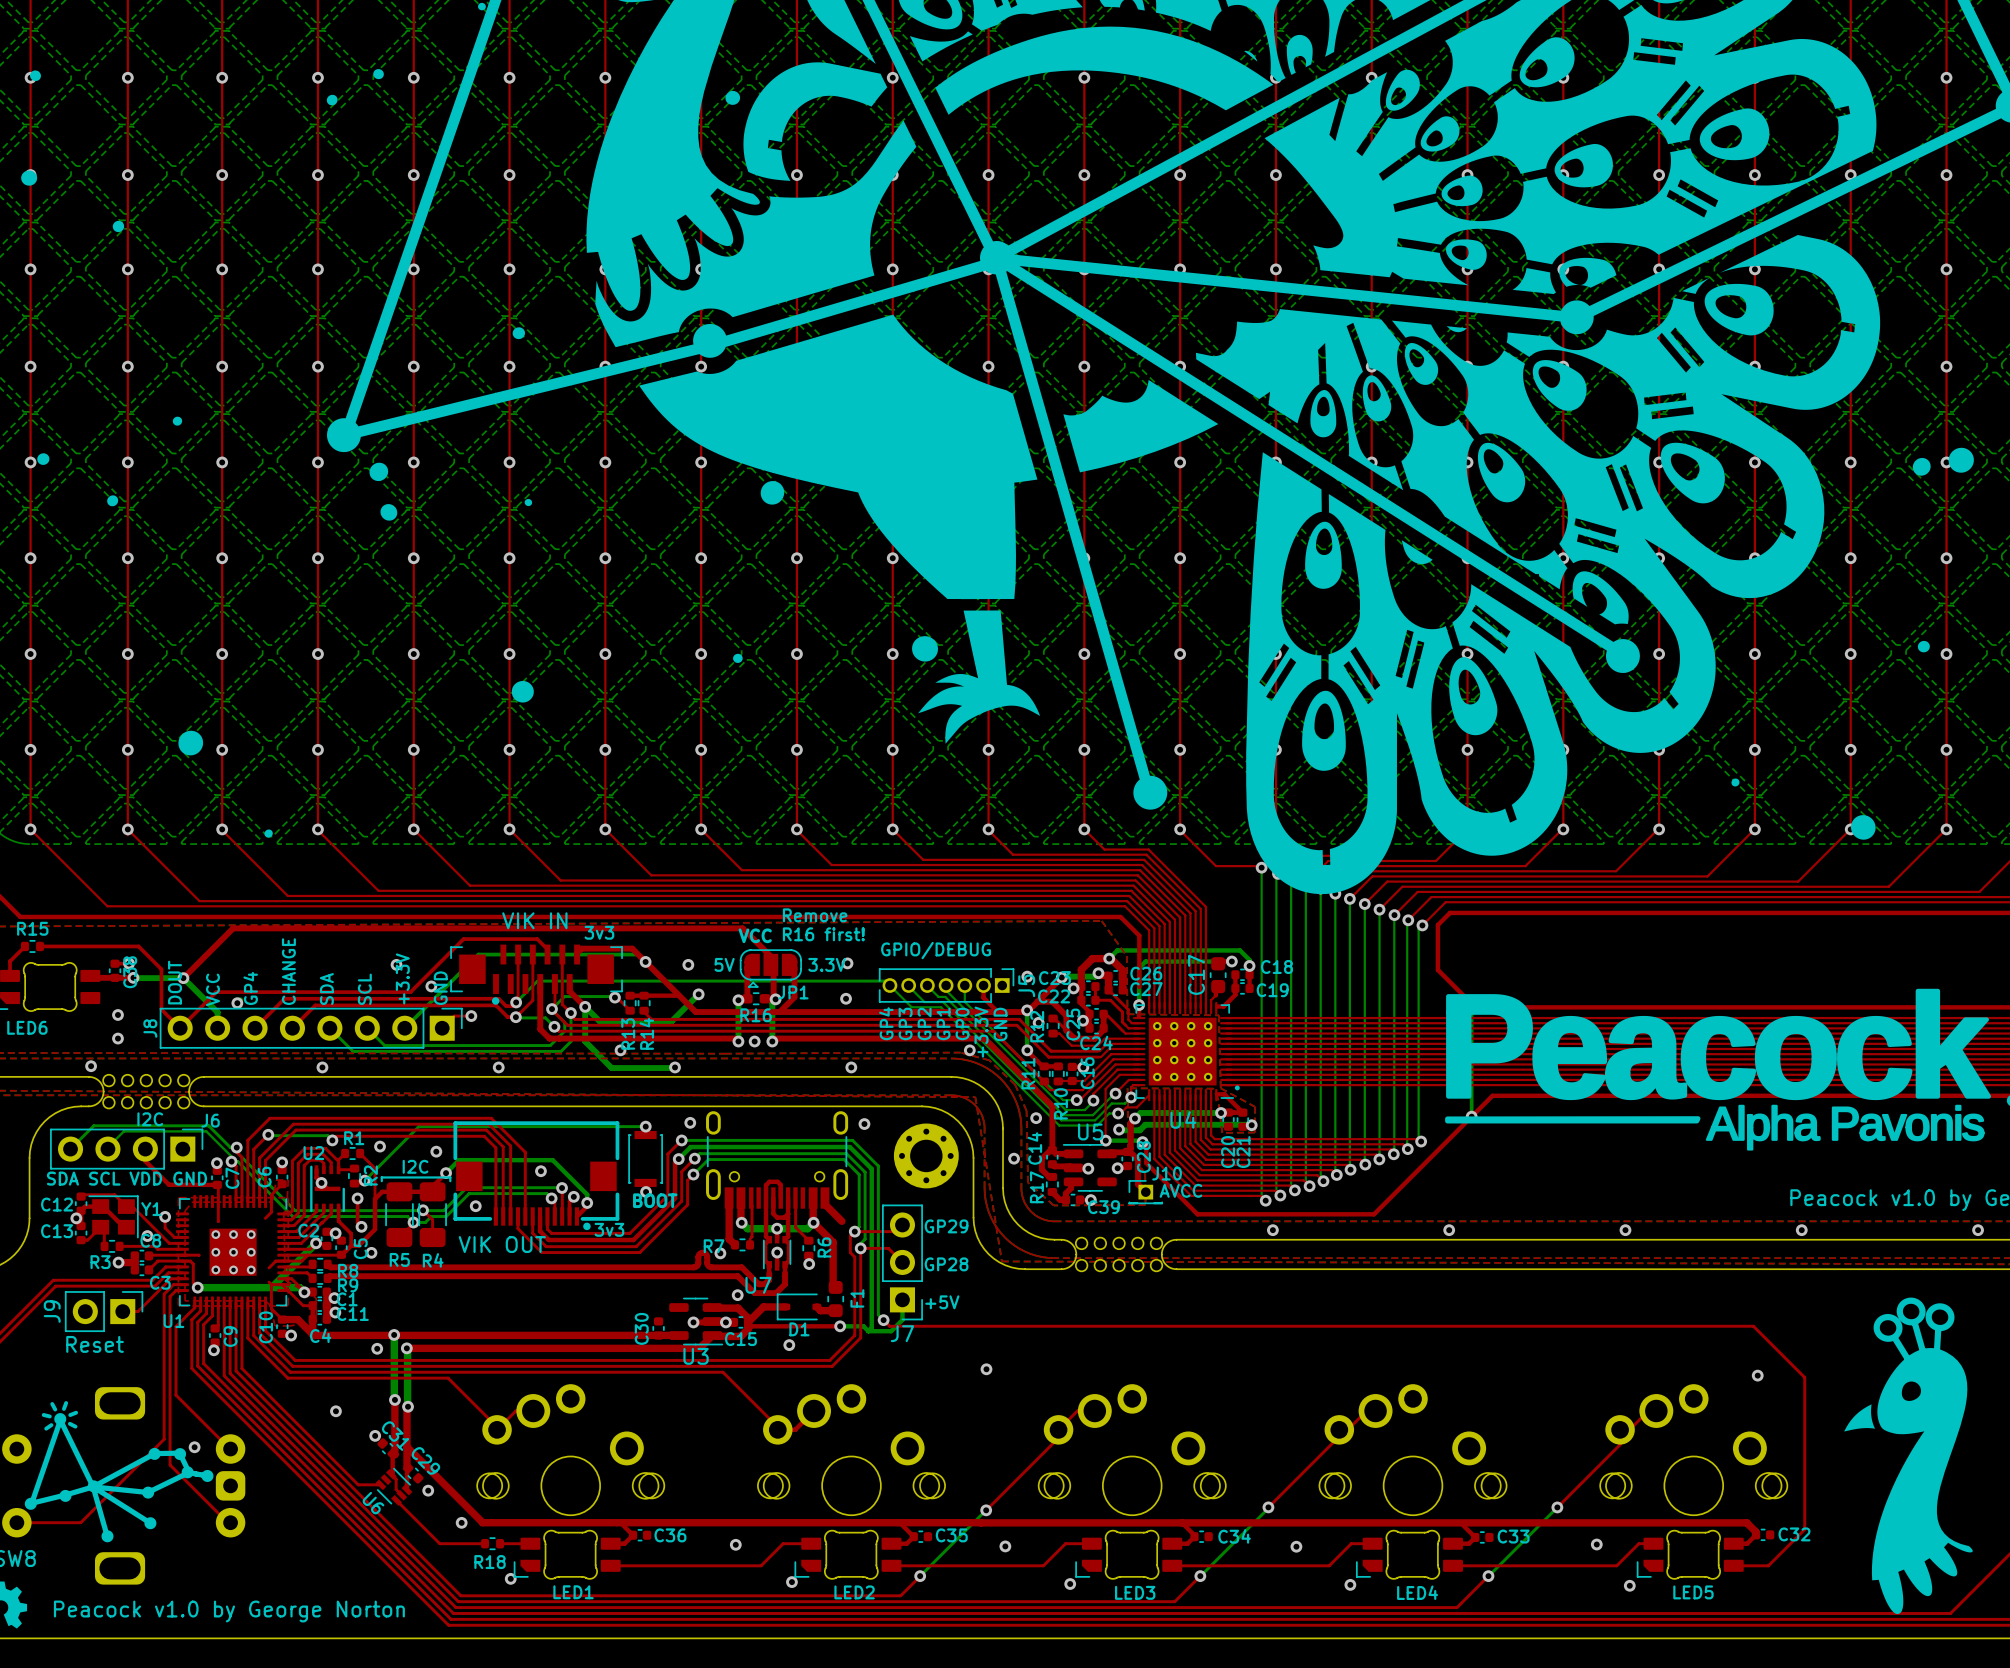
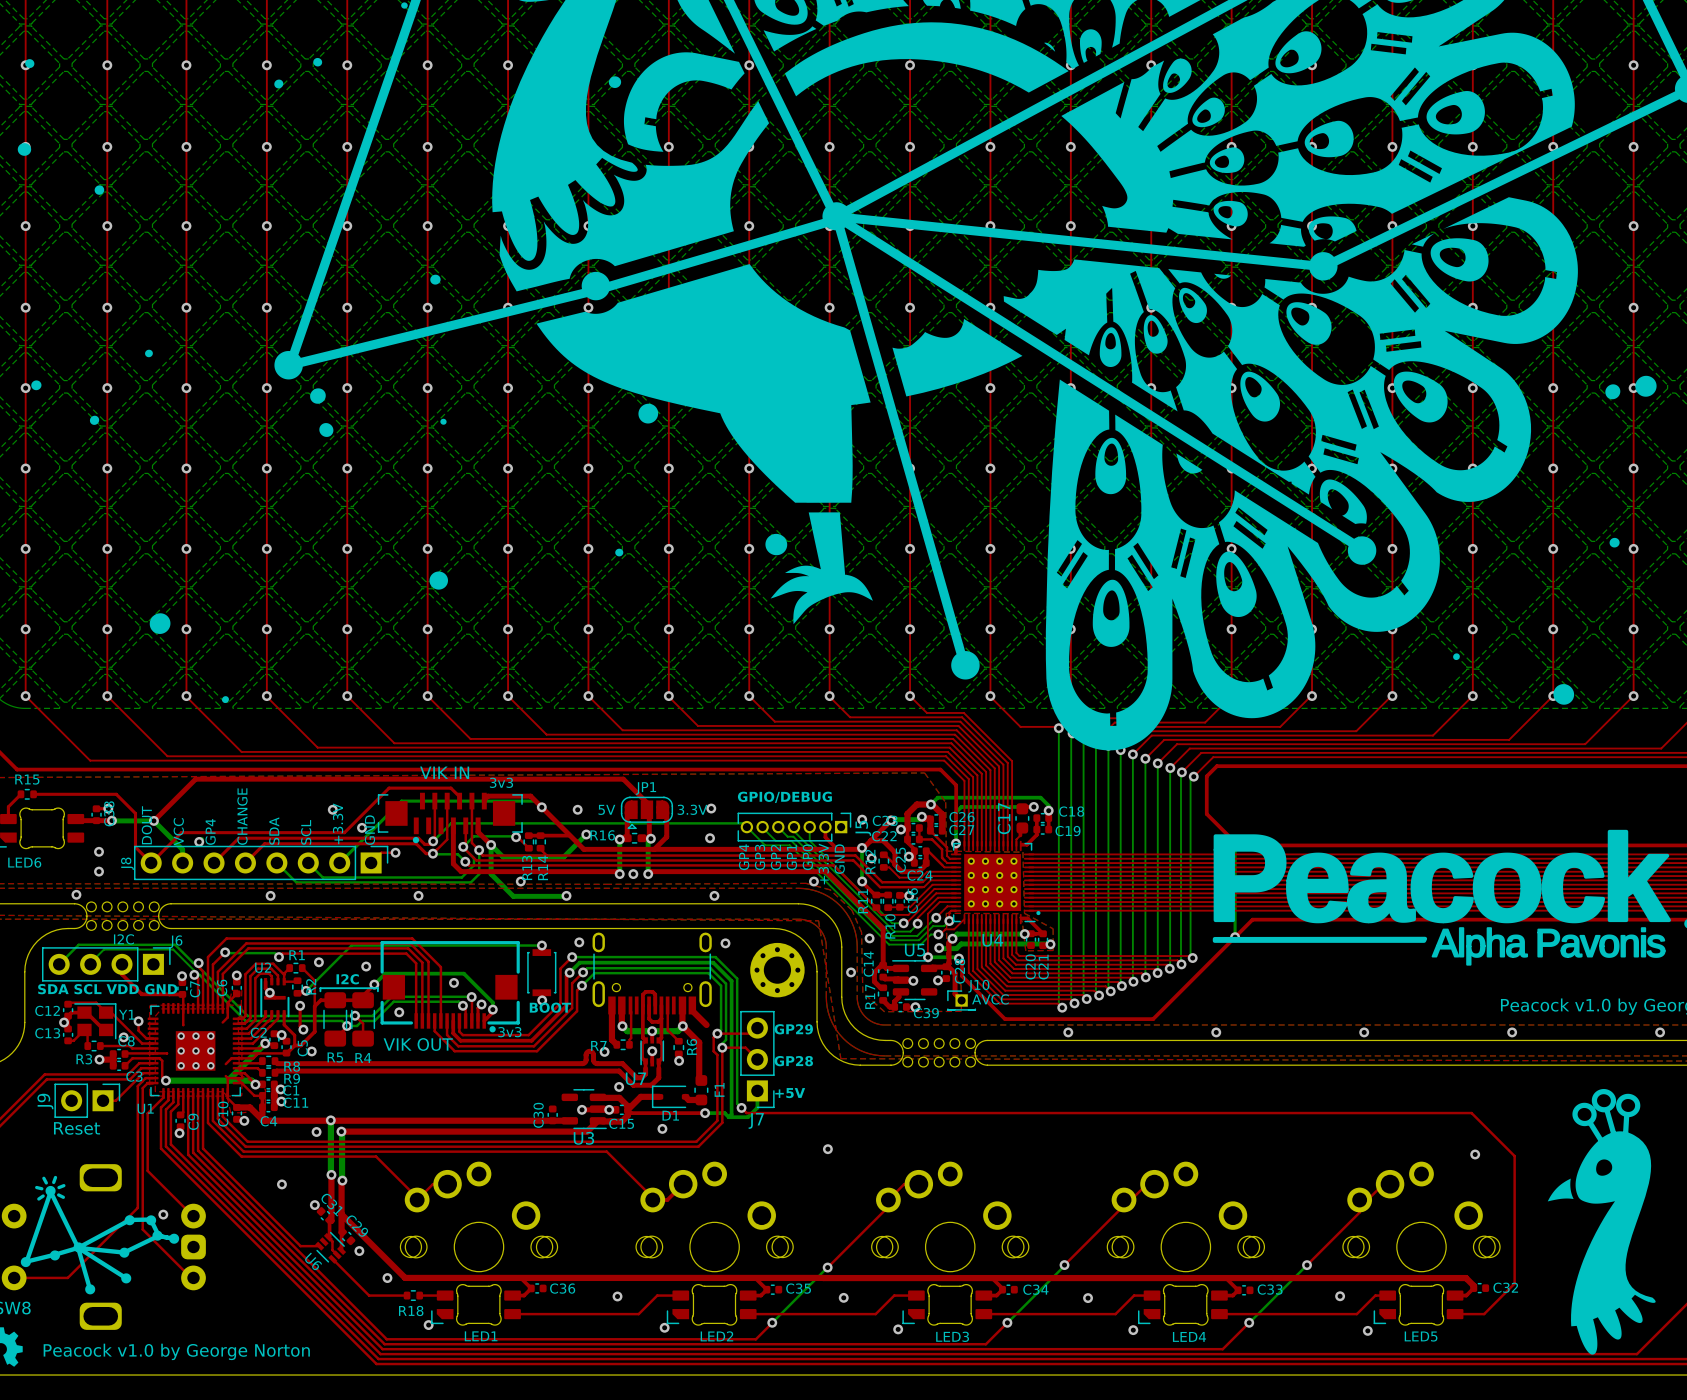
text: Remove (815, 915) -> none
text: R16 first! (823, 934) -> none
text: VCC (755, 935) -> none
JP1 name position: JP1 (793, 992) -> JP1 (645, 788)
R16 name position: R16 (756, 1015) -> R16 (602, 835)

